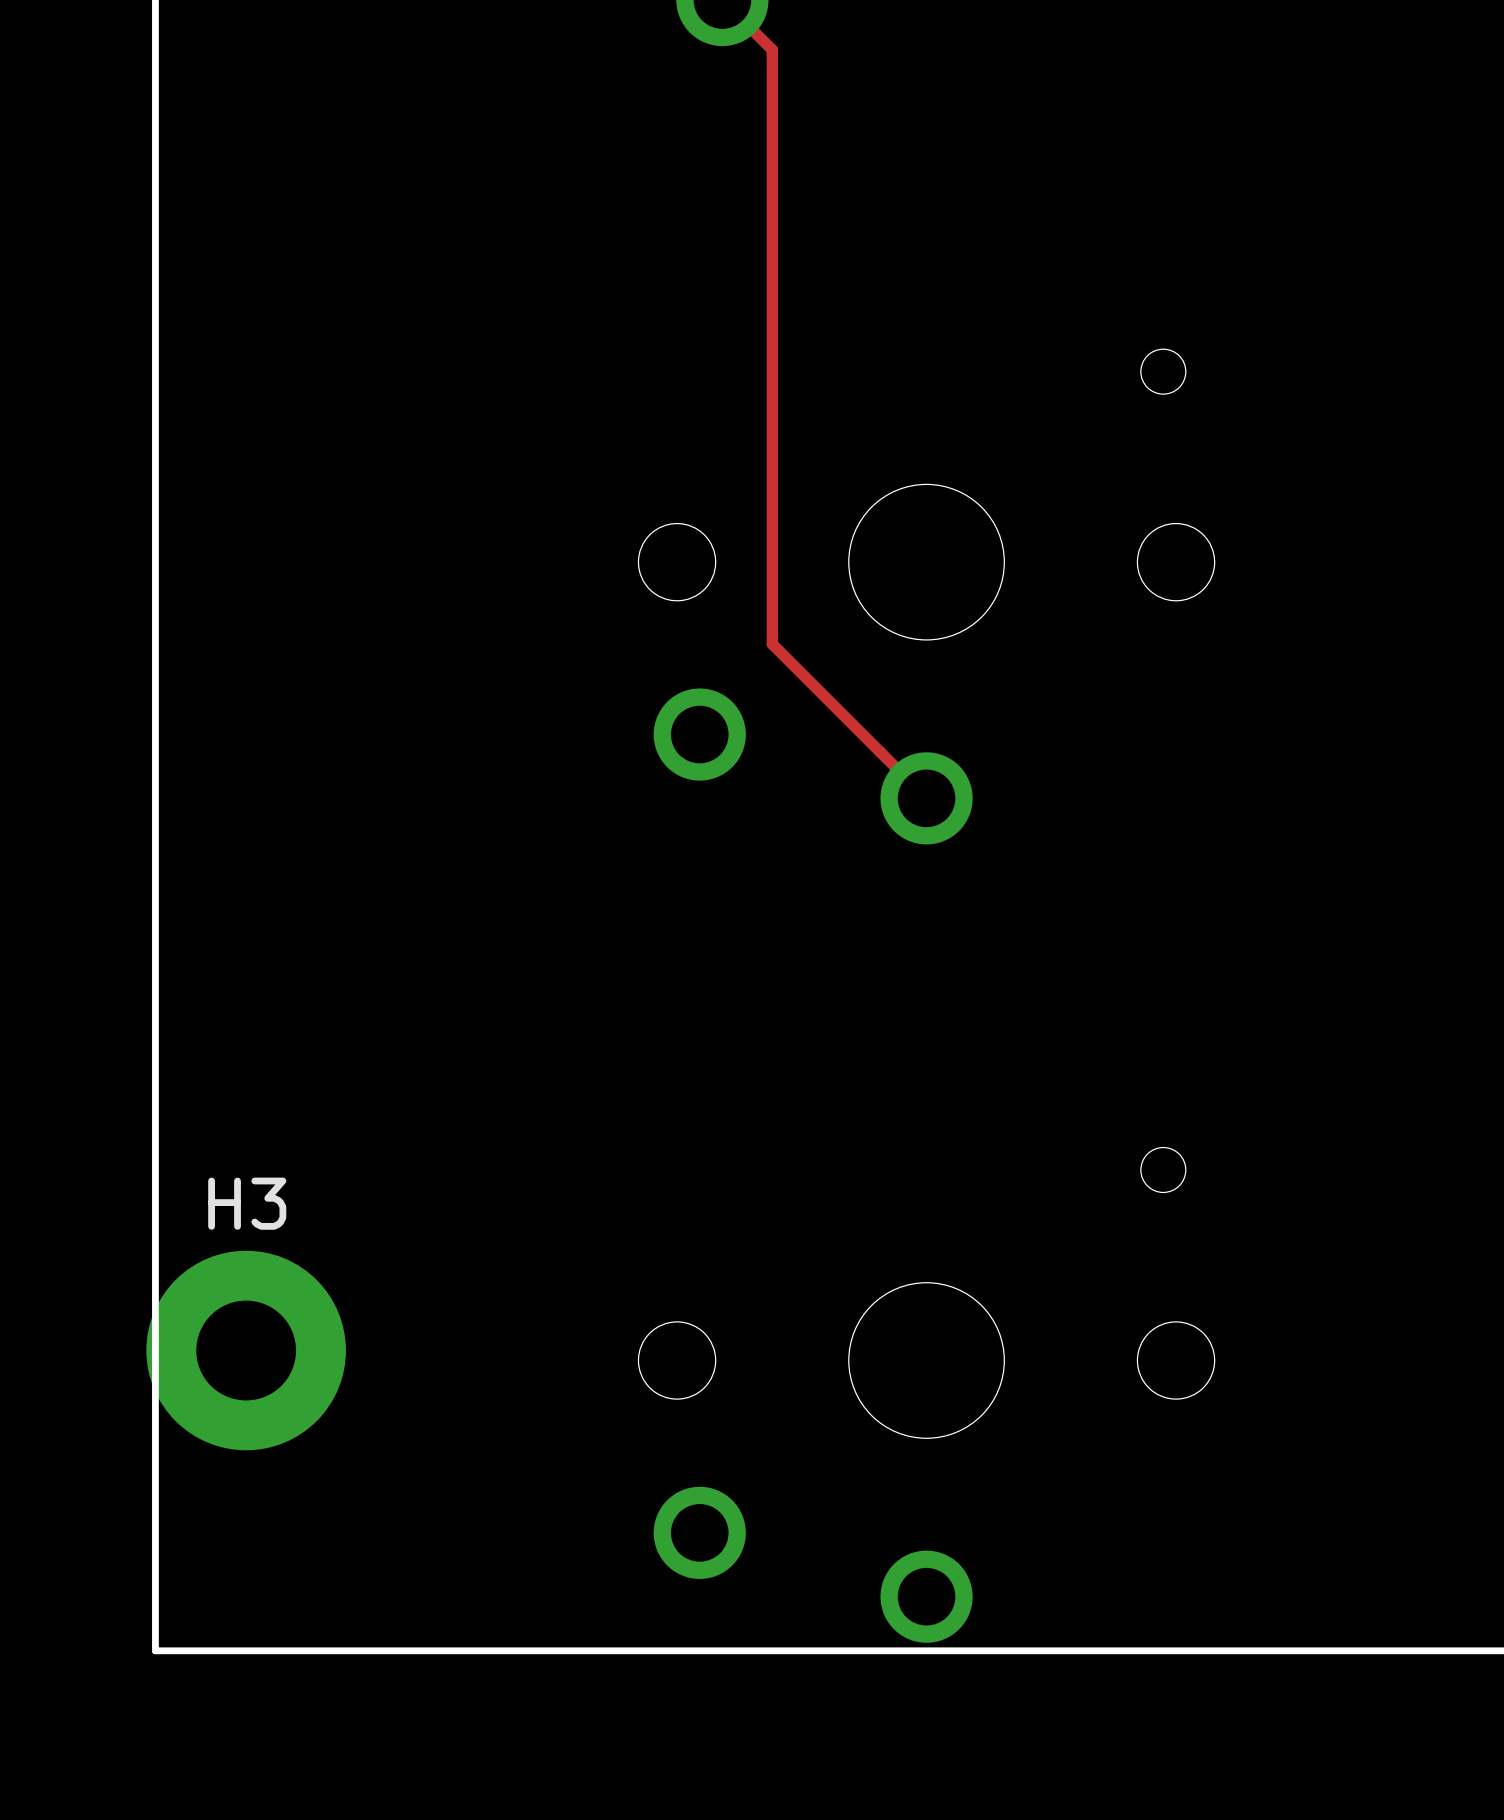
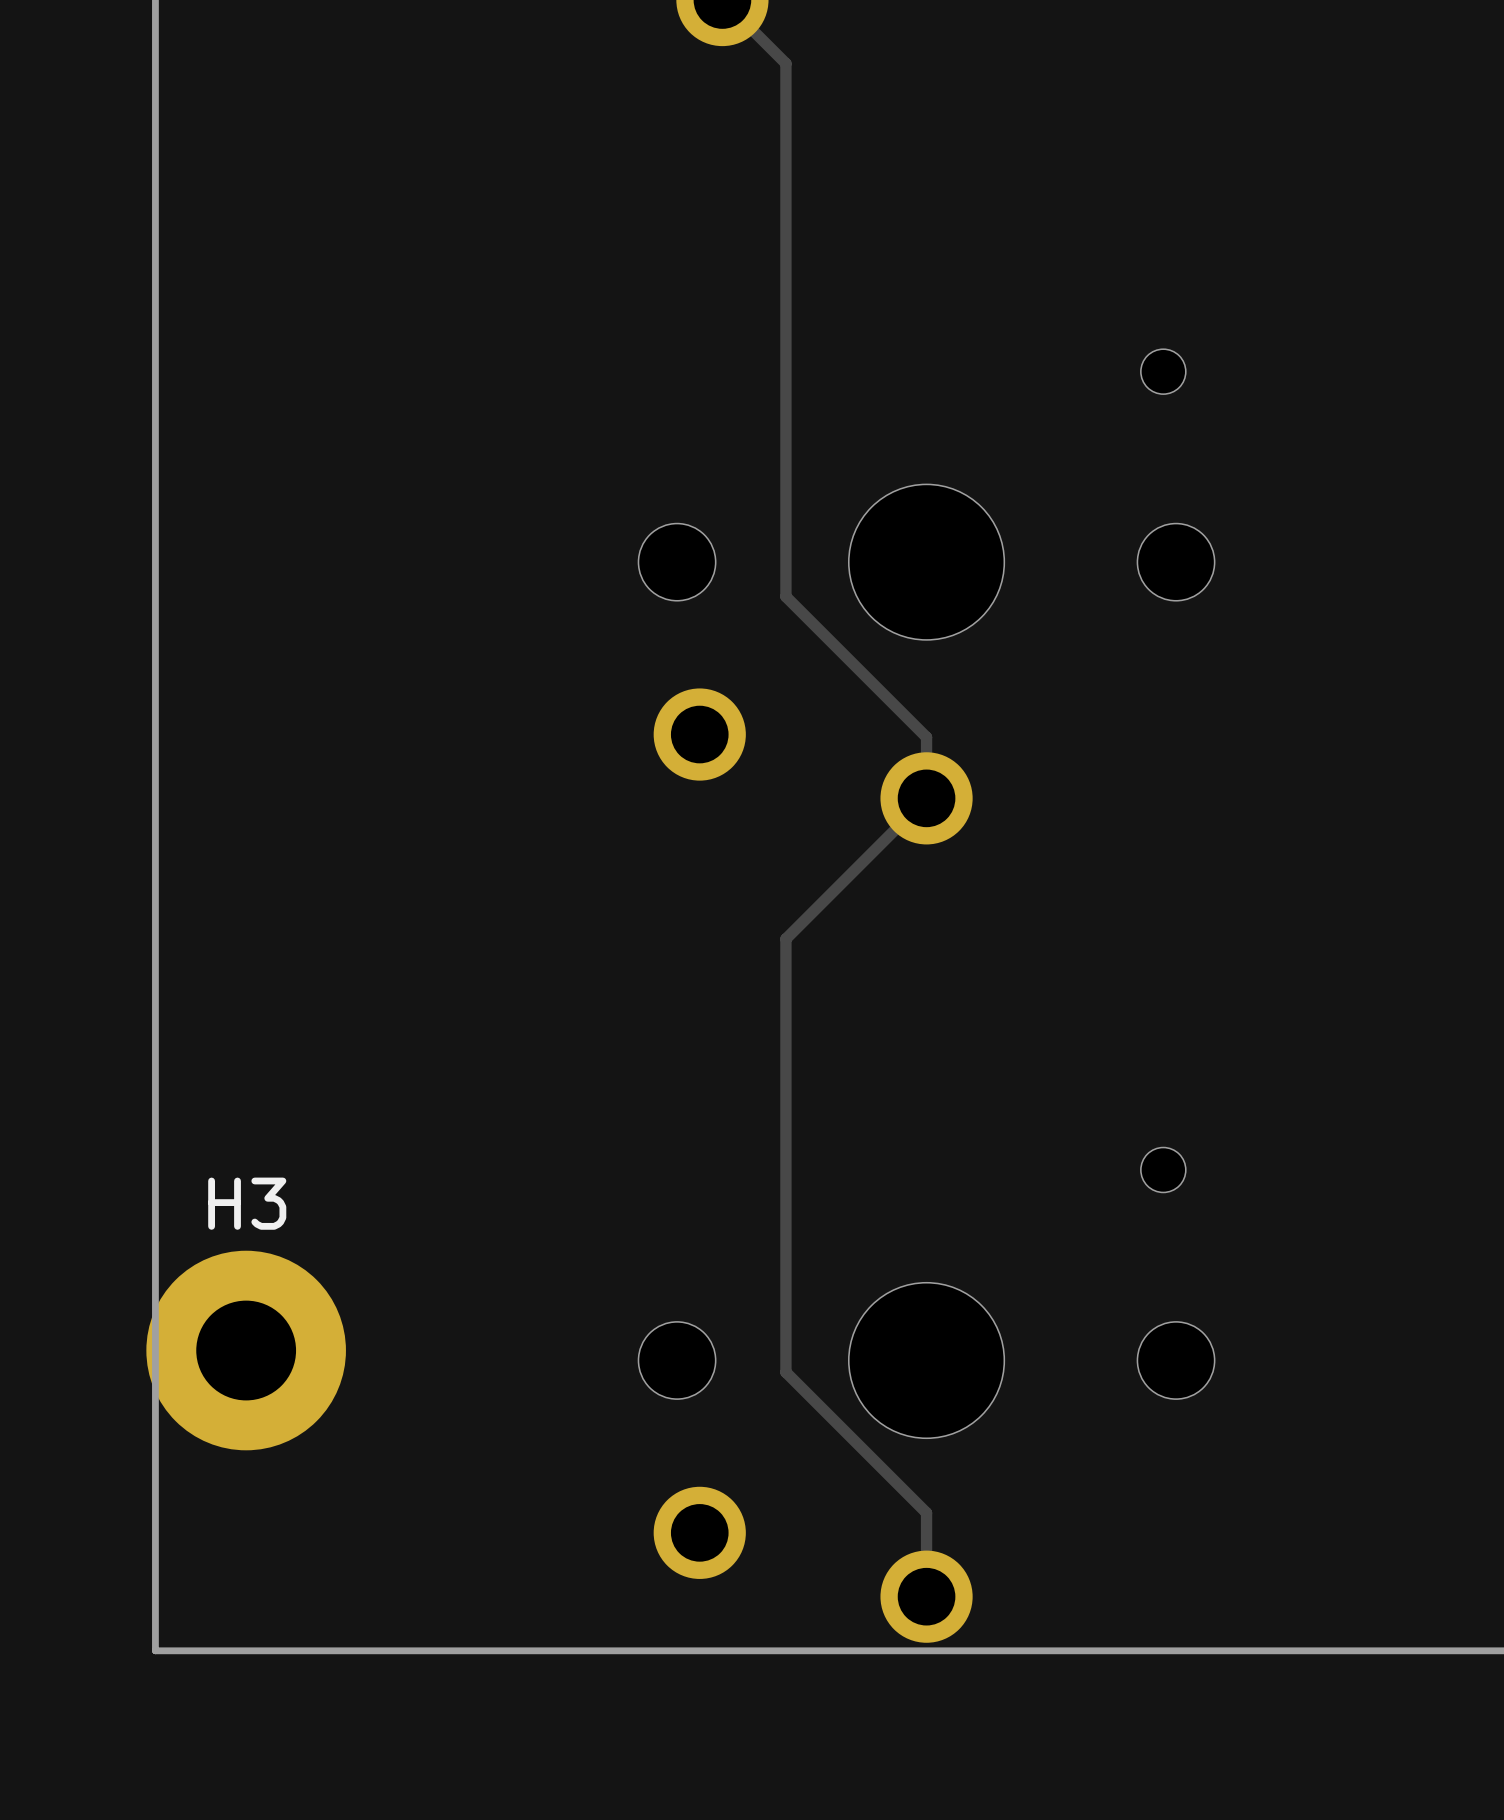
track: (772, 49) (772, 644) (926, 798) -> (772, 49) (785, 63) (785, 596) (926, 737) (926, 798) (785, 938) (785, 1372) (926, 1512) (926, 1596)

